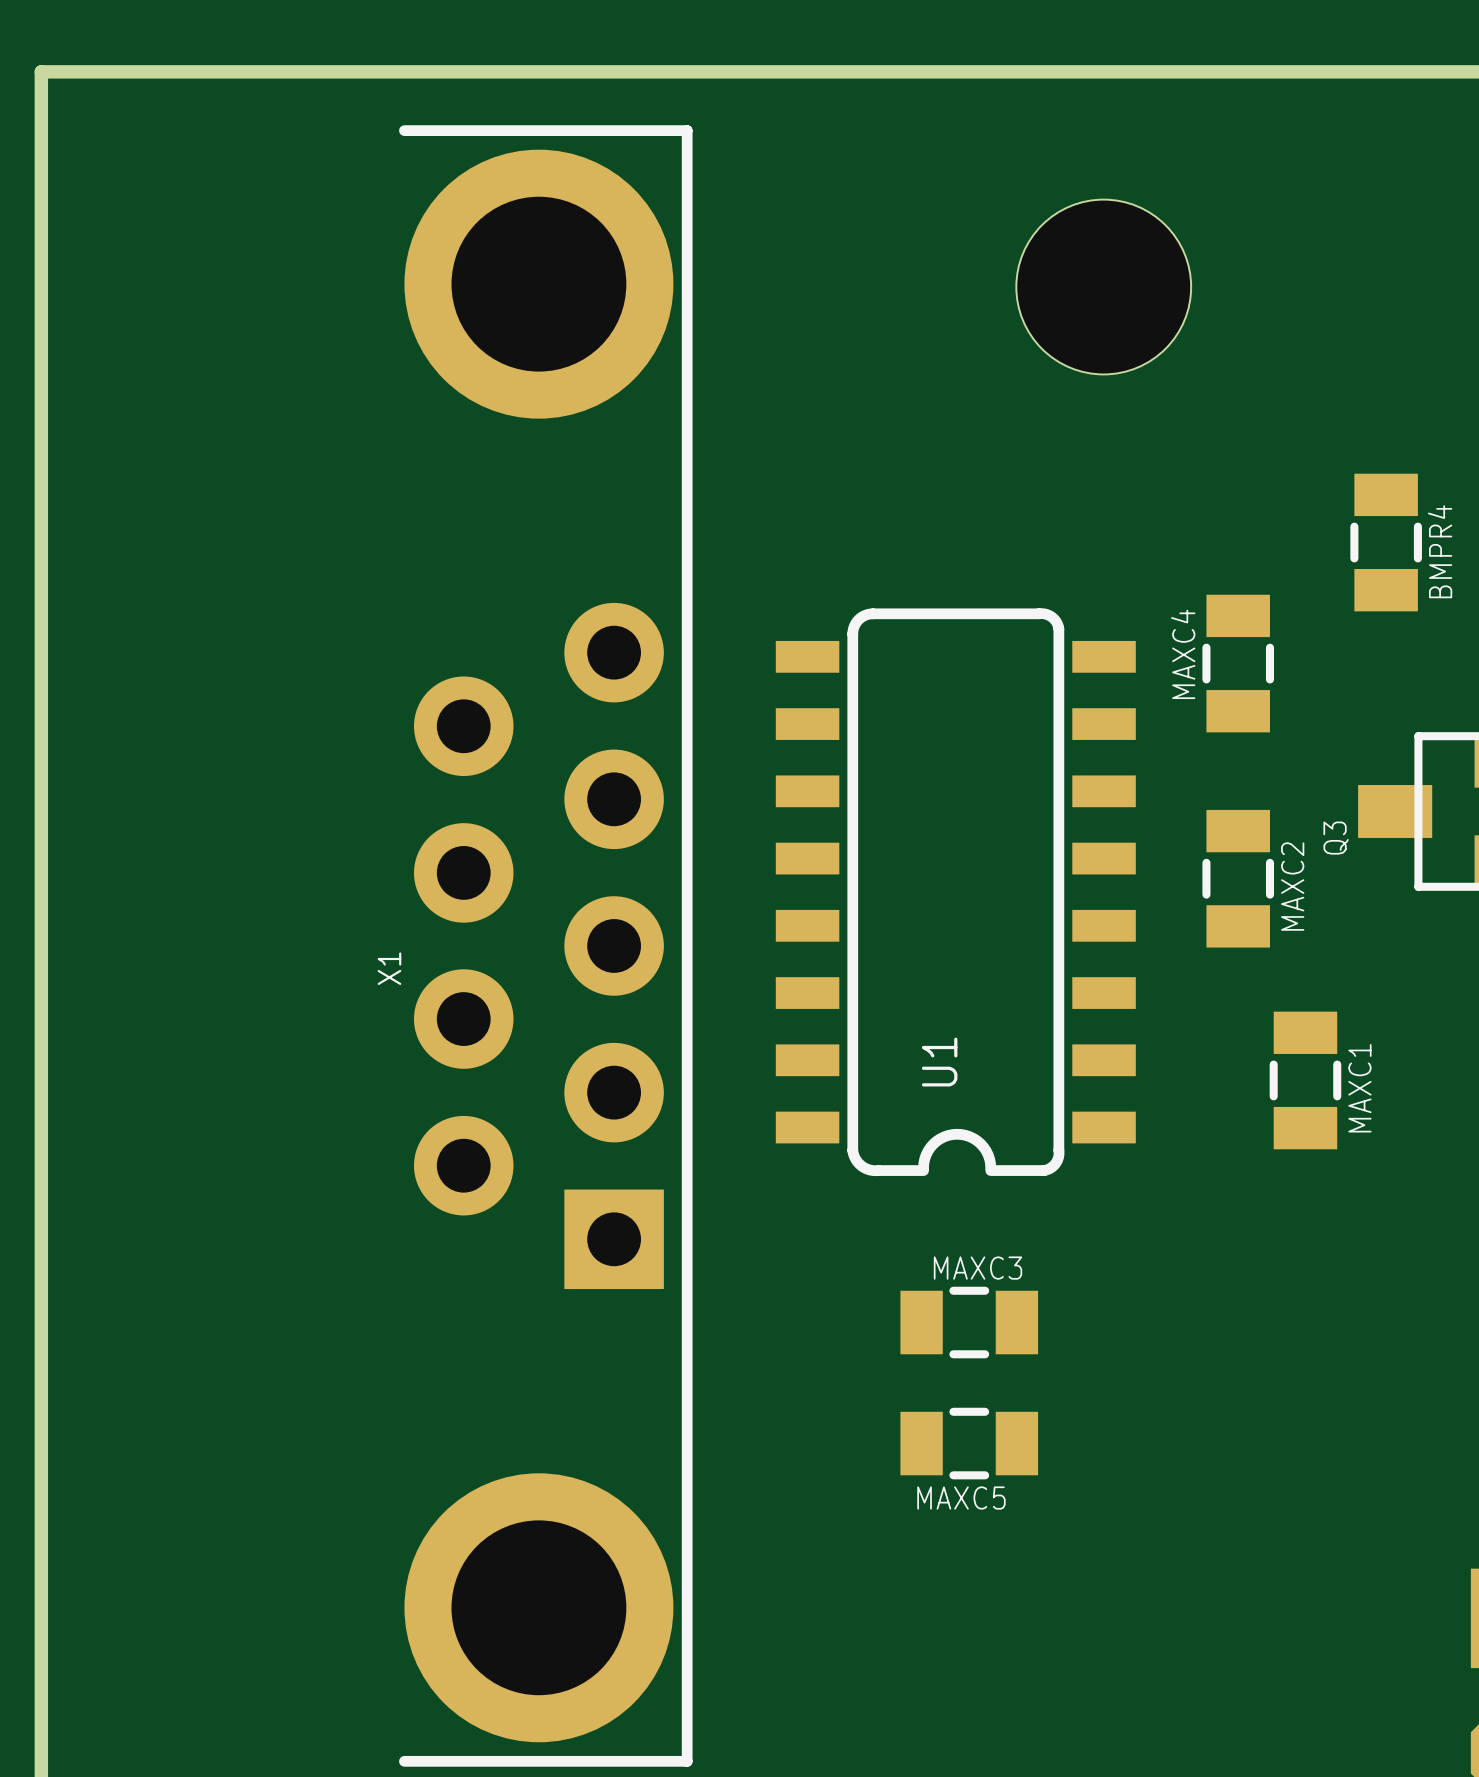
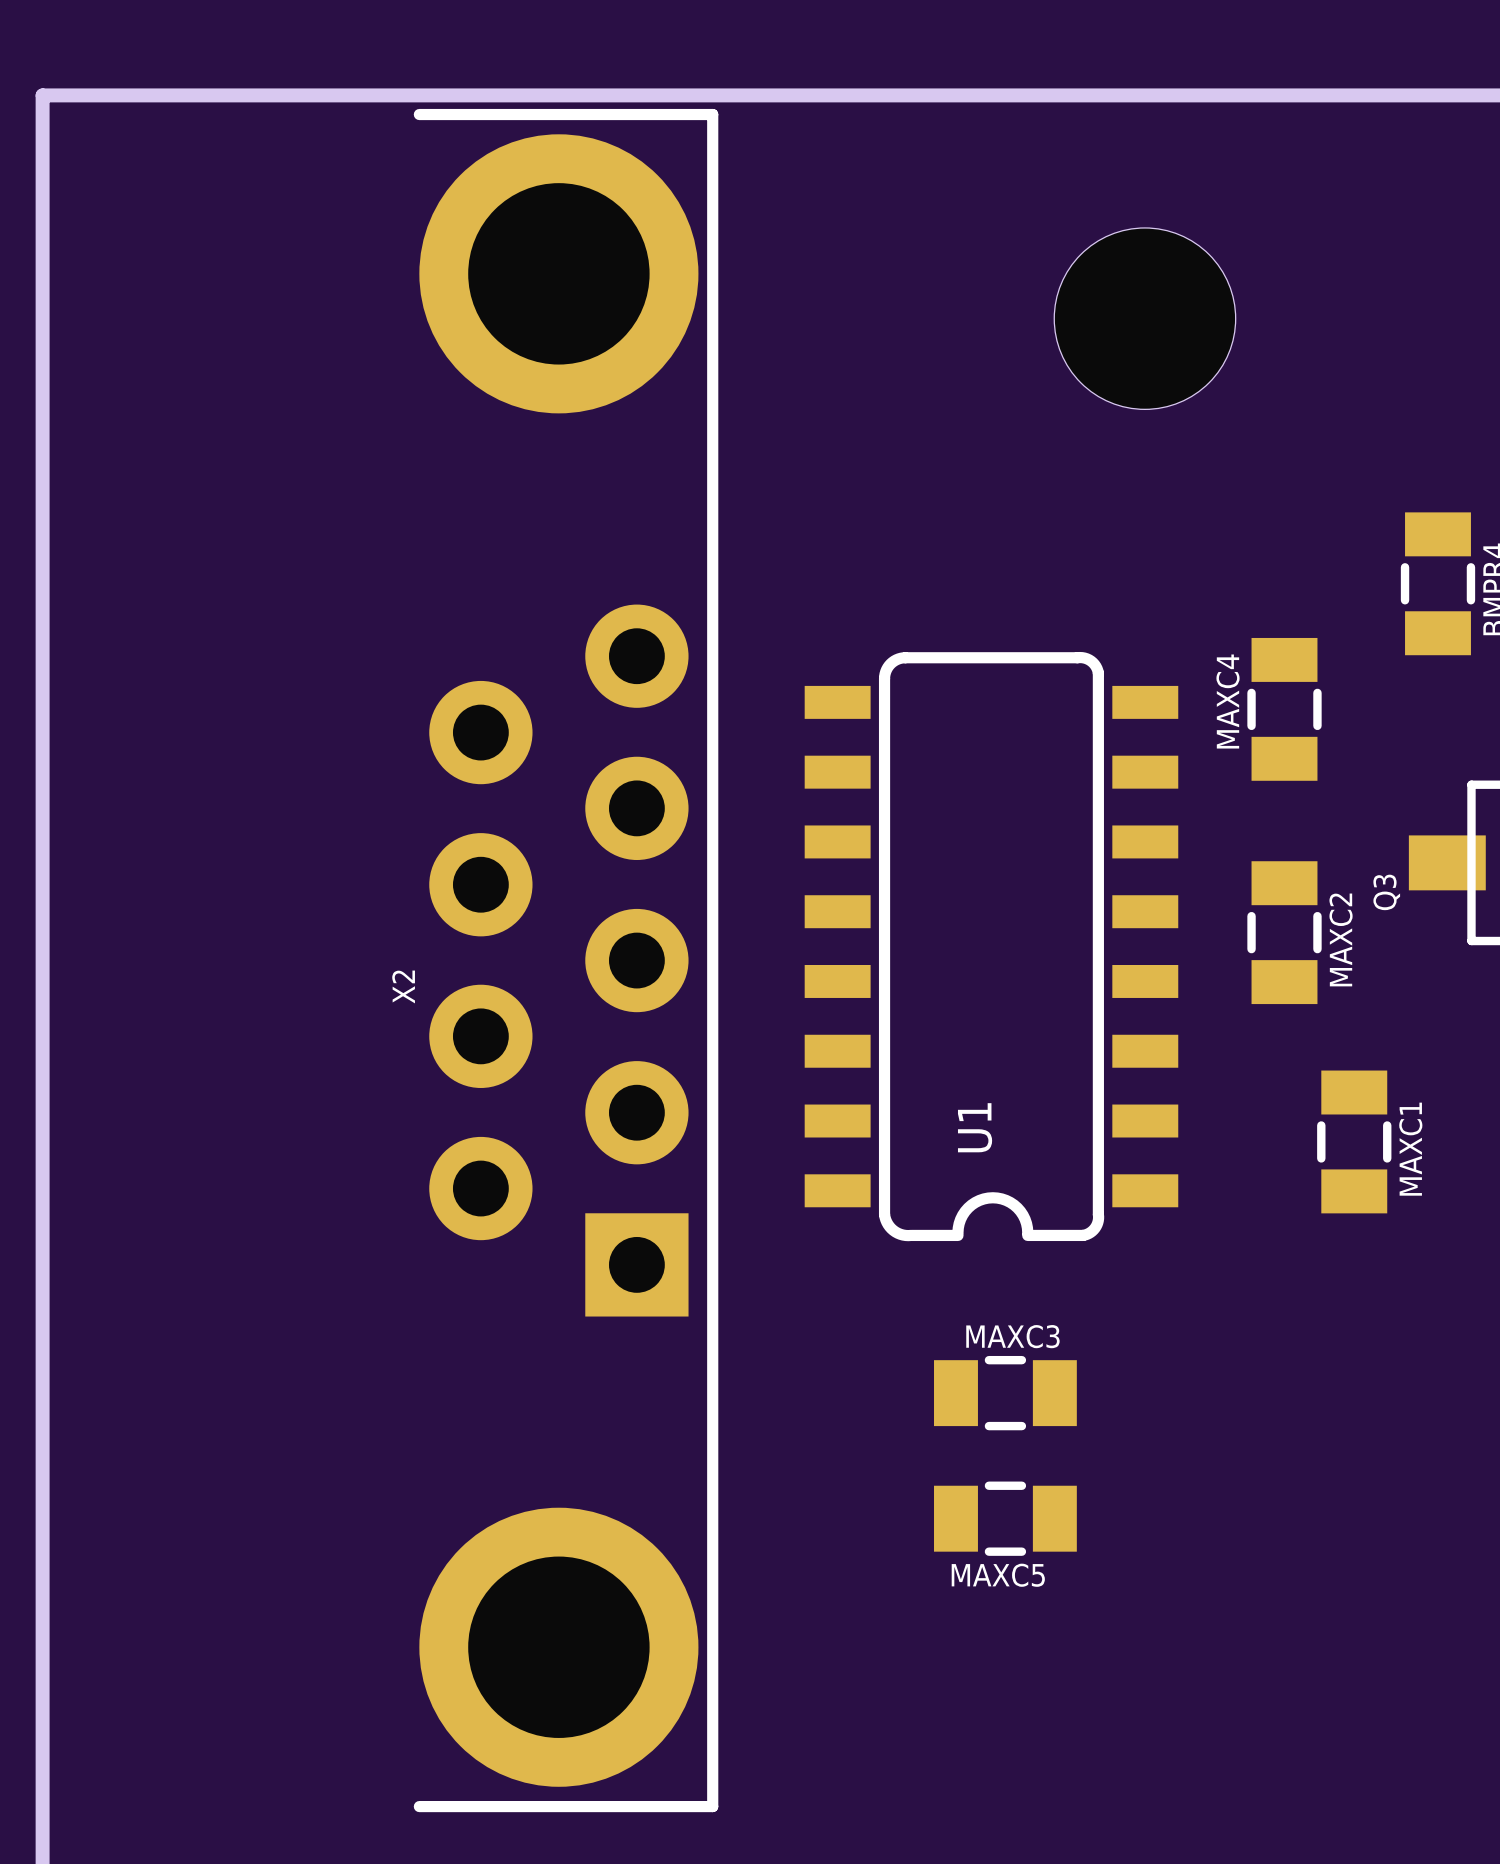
X1 position: (545, 945) -> (566, 960)
X1 name: X1 (389, 968) -> X2 (403, 986)

